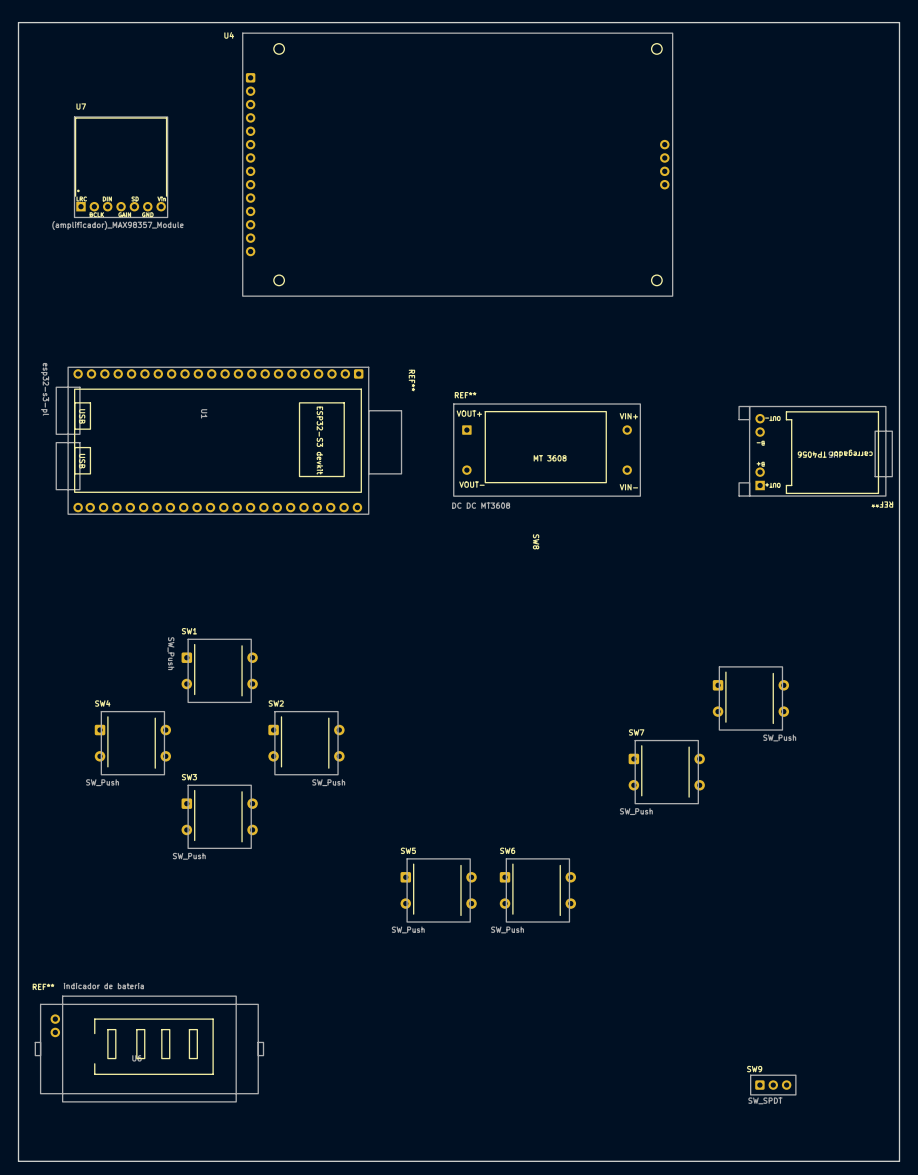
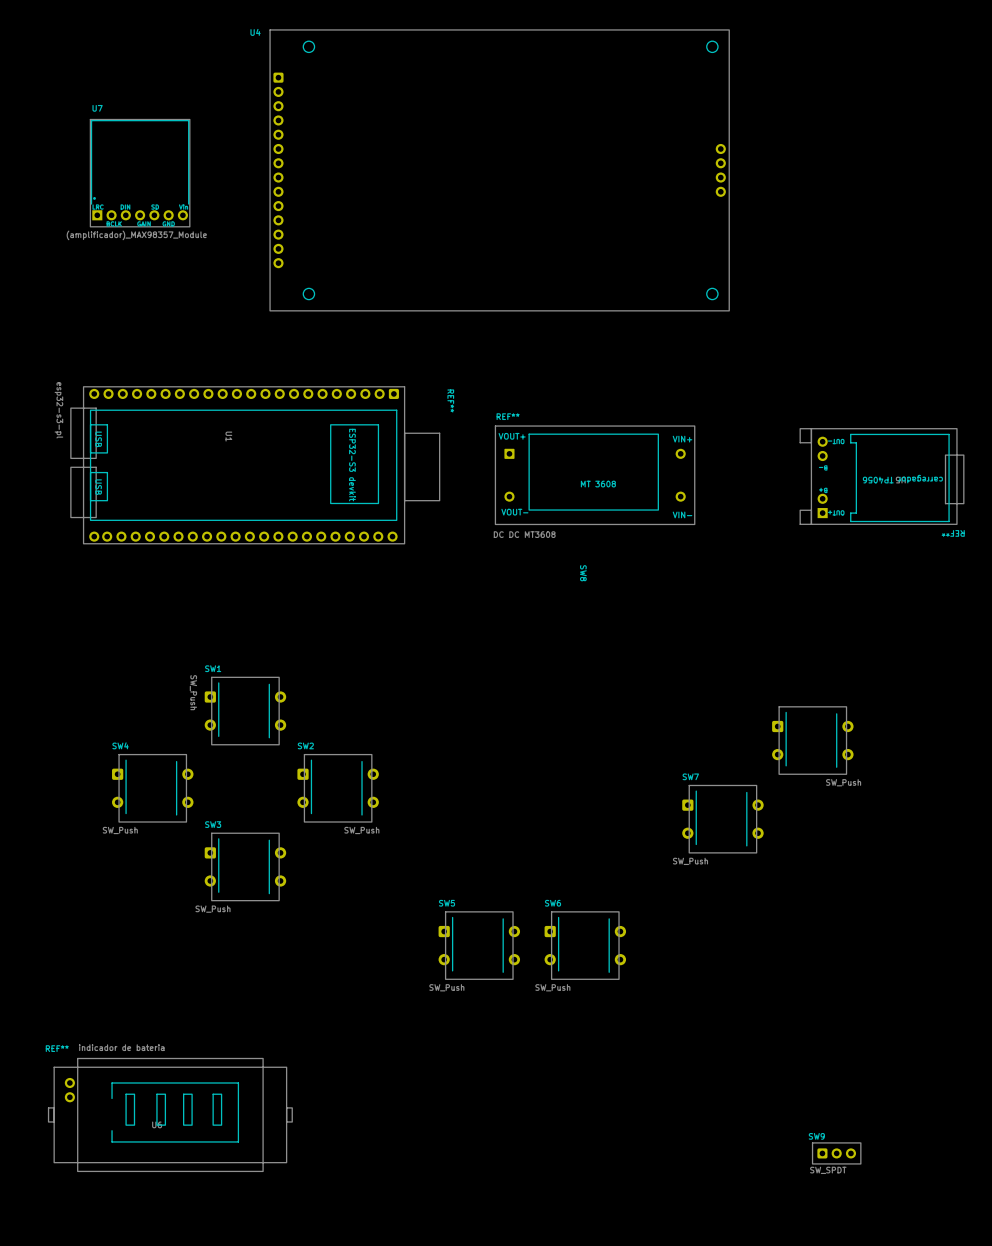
board edge: (18, 22) (899, 22) (899, 1161) (18, 1161) (18, 22) -> none

